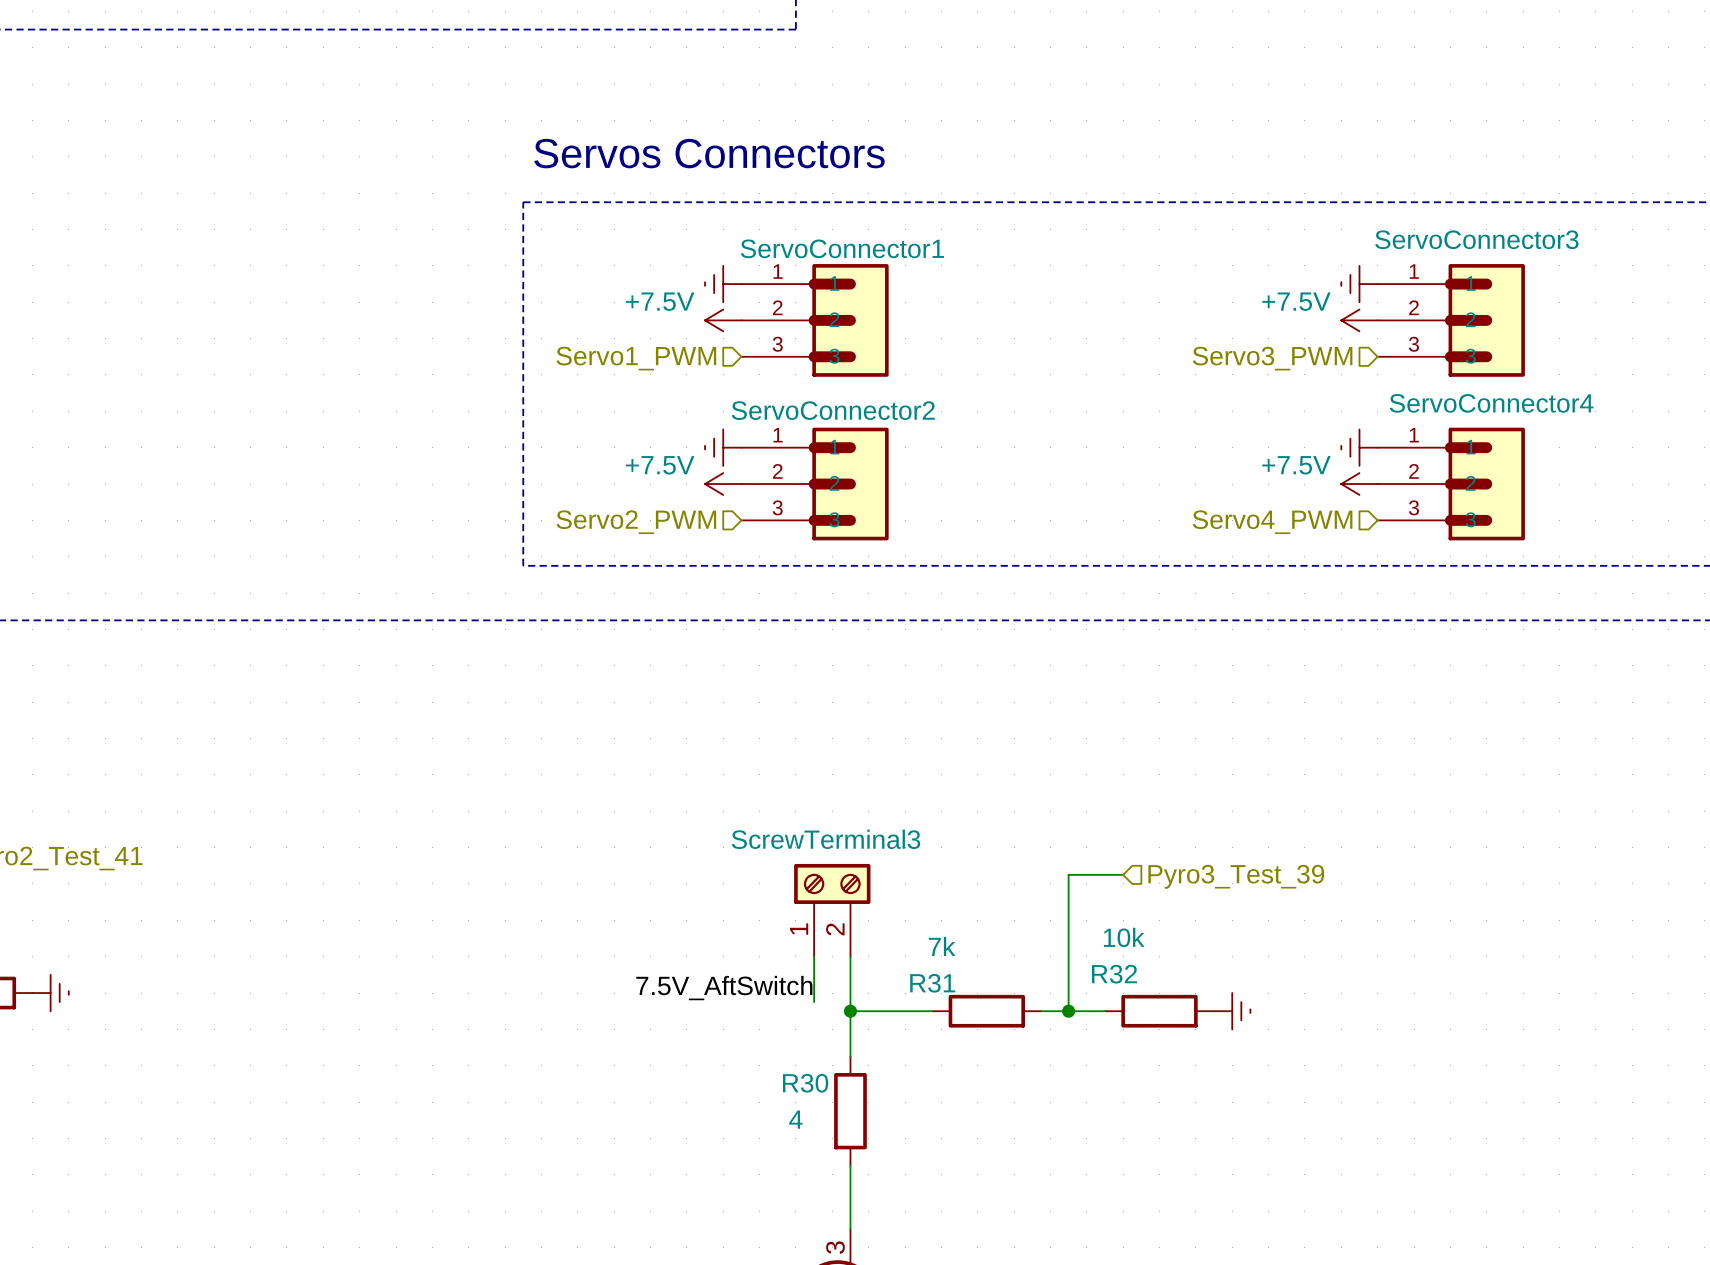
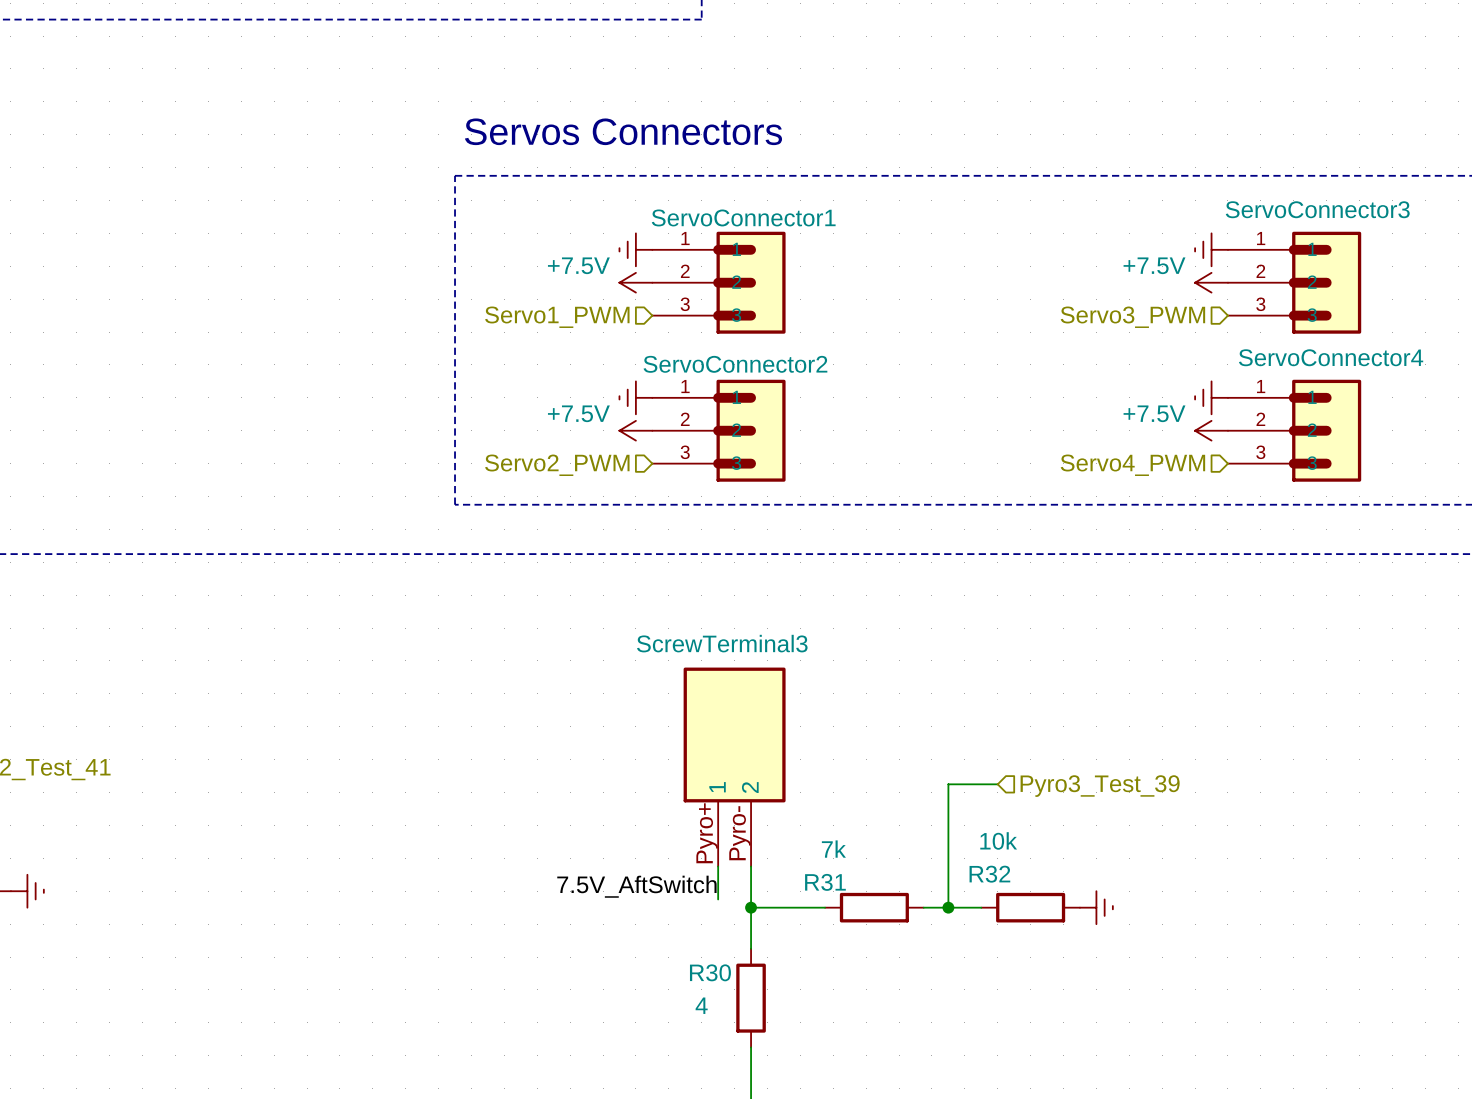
ScrewTerminal3 name position: ScrewTerminal3 (825, 839) -> ScrewTerminal3 (722, 643)
ScrewTerminal3 symbol: [794, 863, 871, 957] -> [683, 667, 786, 867]

